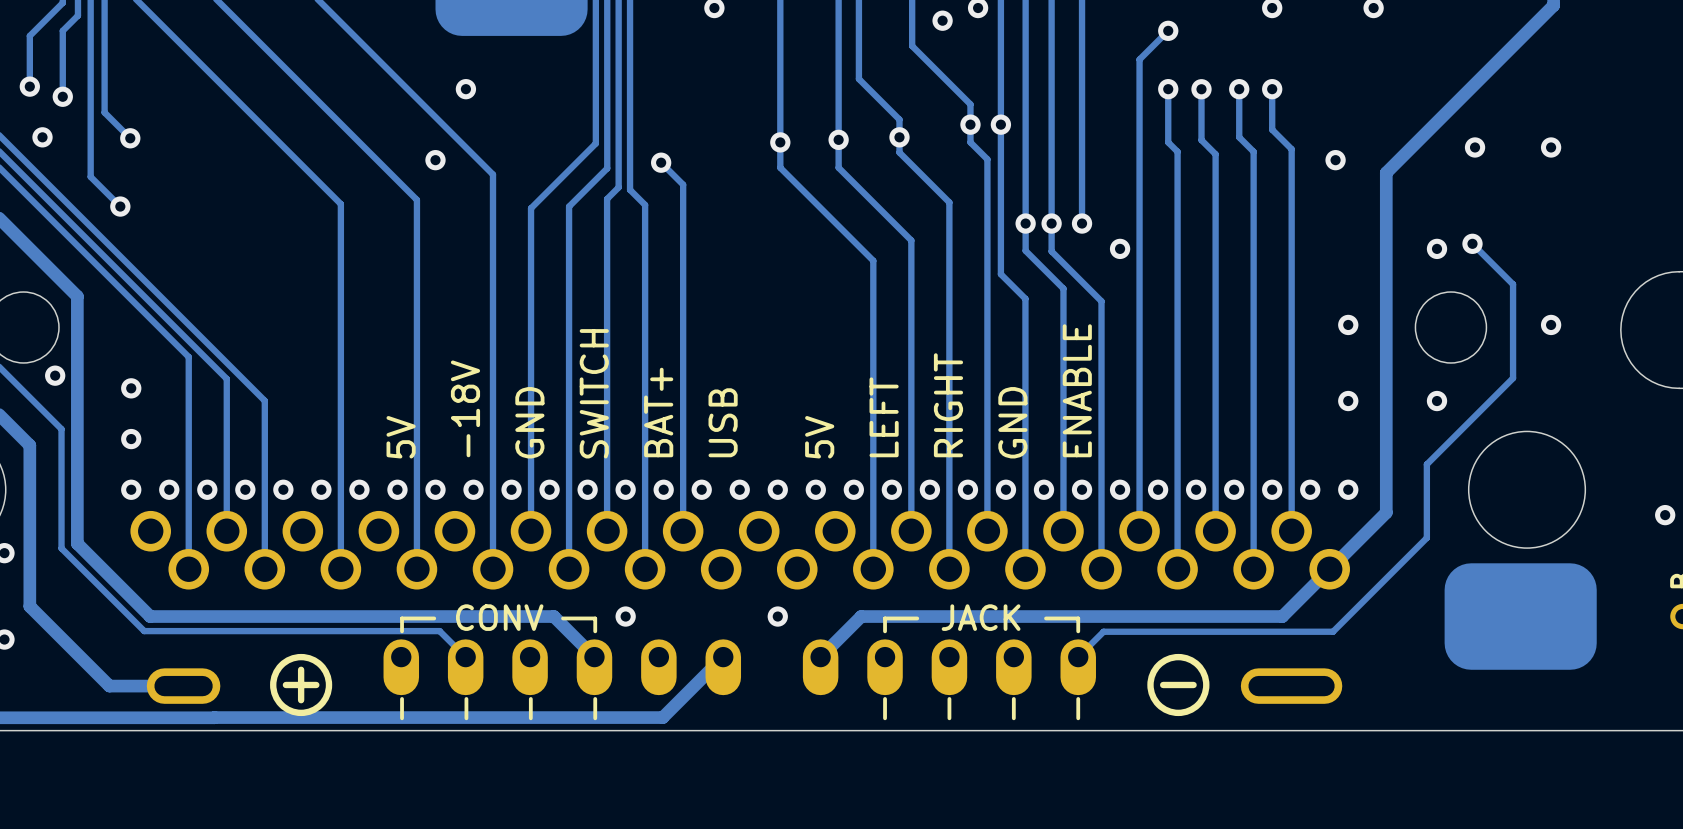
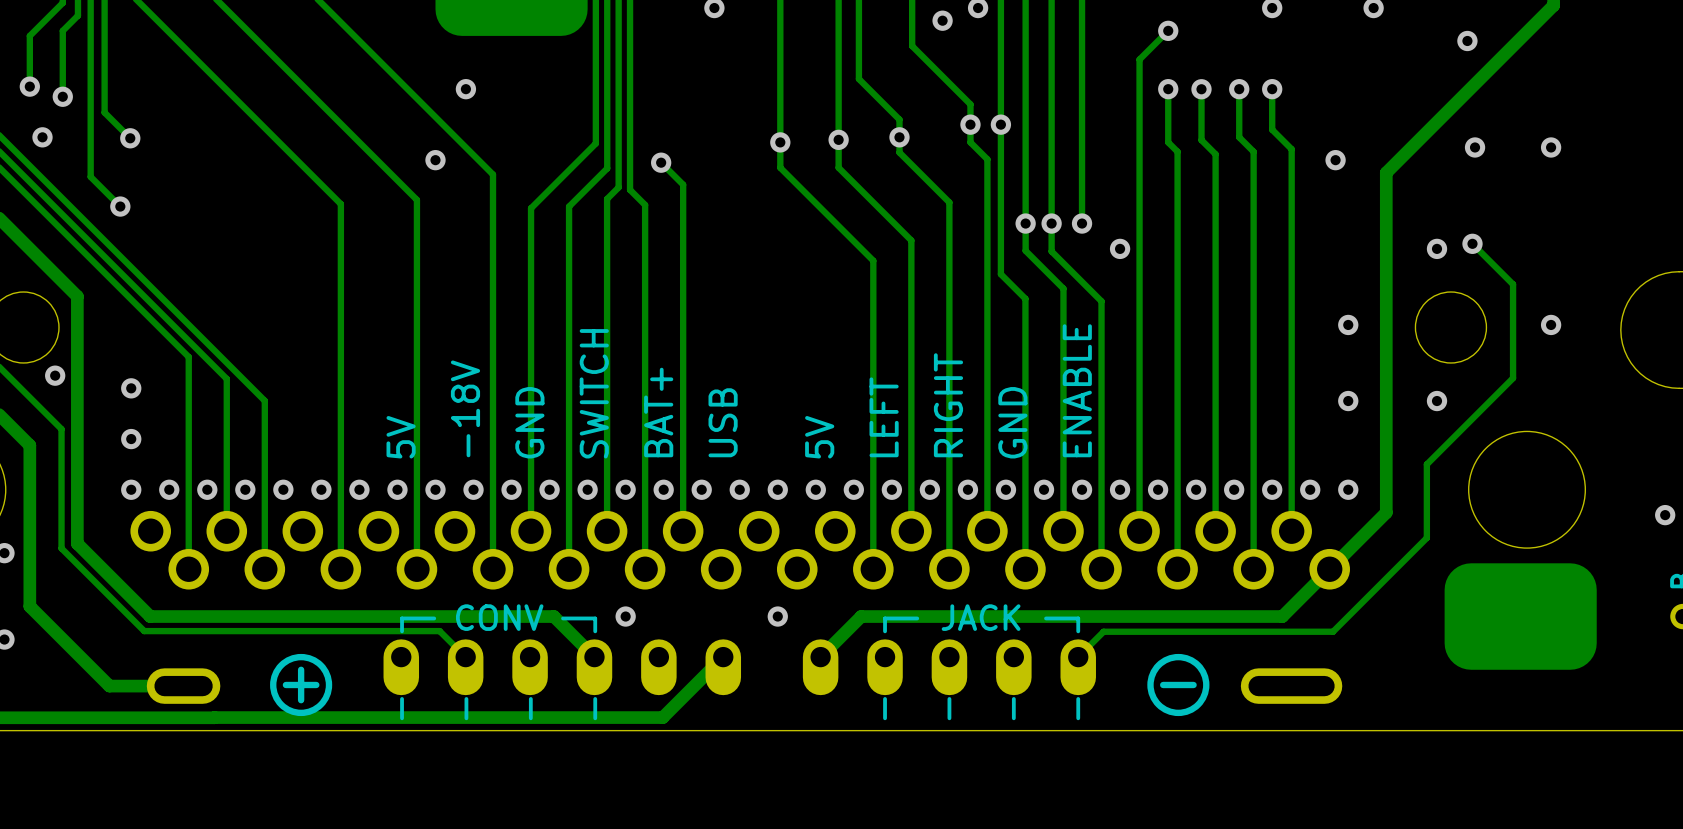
via: none -> (1467, 40)

